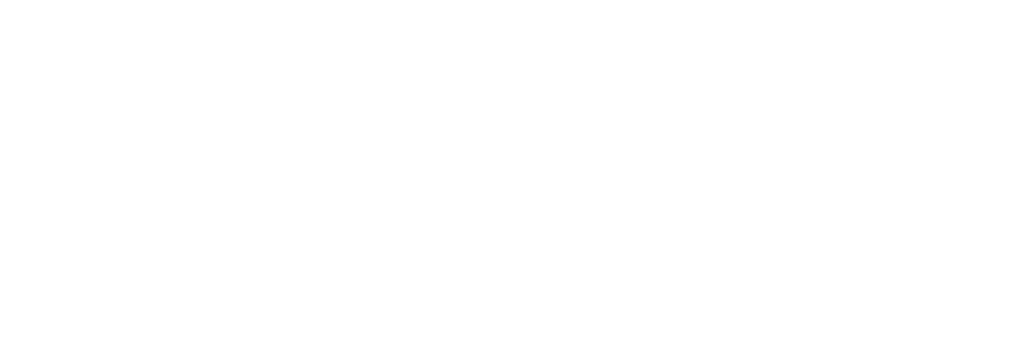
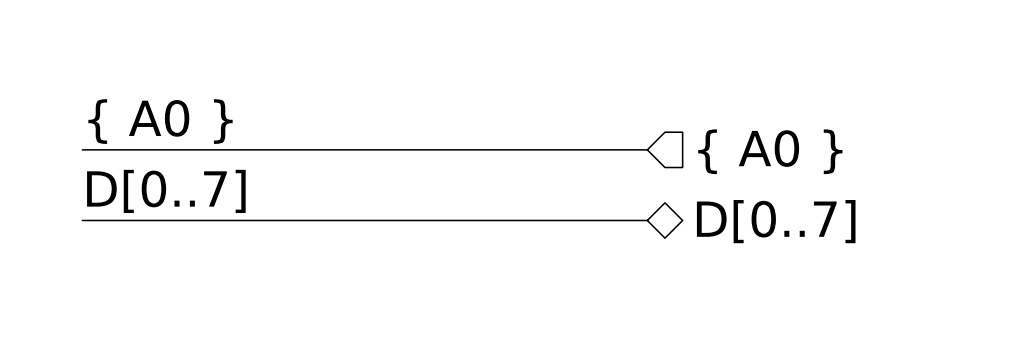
label: none -> { A0 } (160, 121)
bus: none -> (82, 149) (647, 149)
hierarchical label: none -> { A0 } (770, 151)
label: none -> D[0..7] (166, 191)
bus: none -> (82, 220) (647, 220)
hierarchical label: none -> D[0..7] (776, 221)

